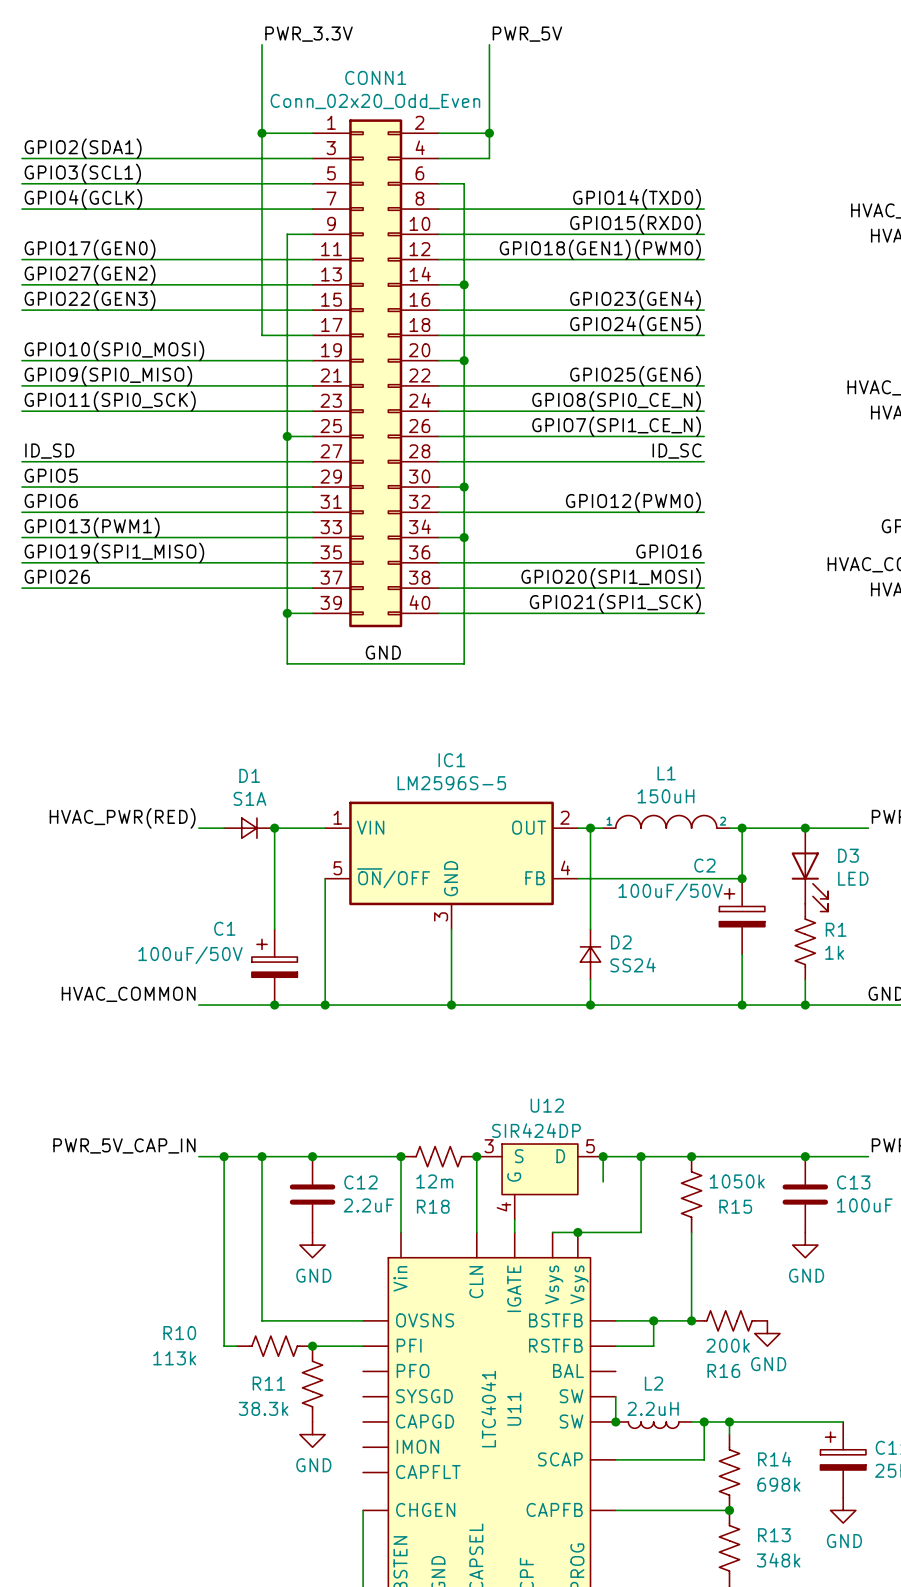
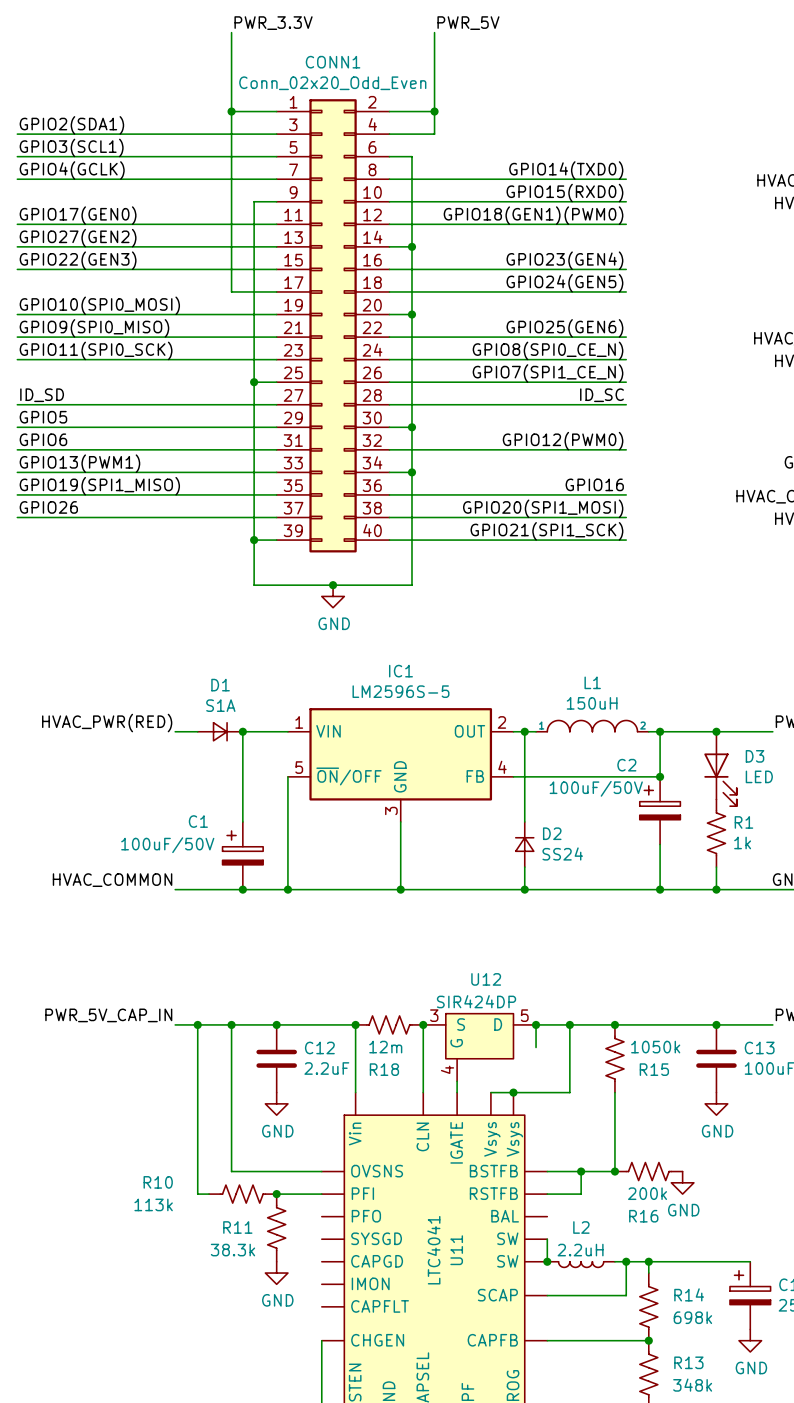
label: GND (383, 652) -> none
junction: none -> (333, 585)
power symbol: none -> GND (333, 596)

